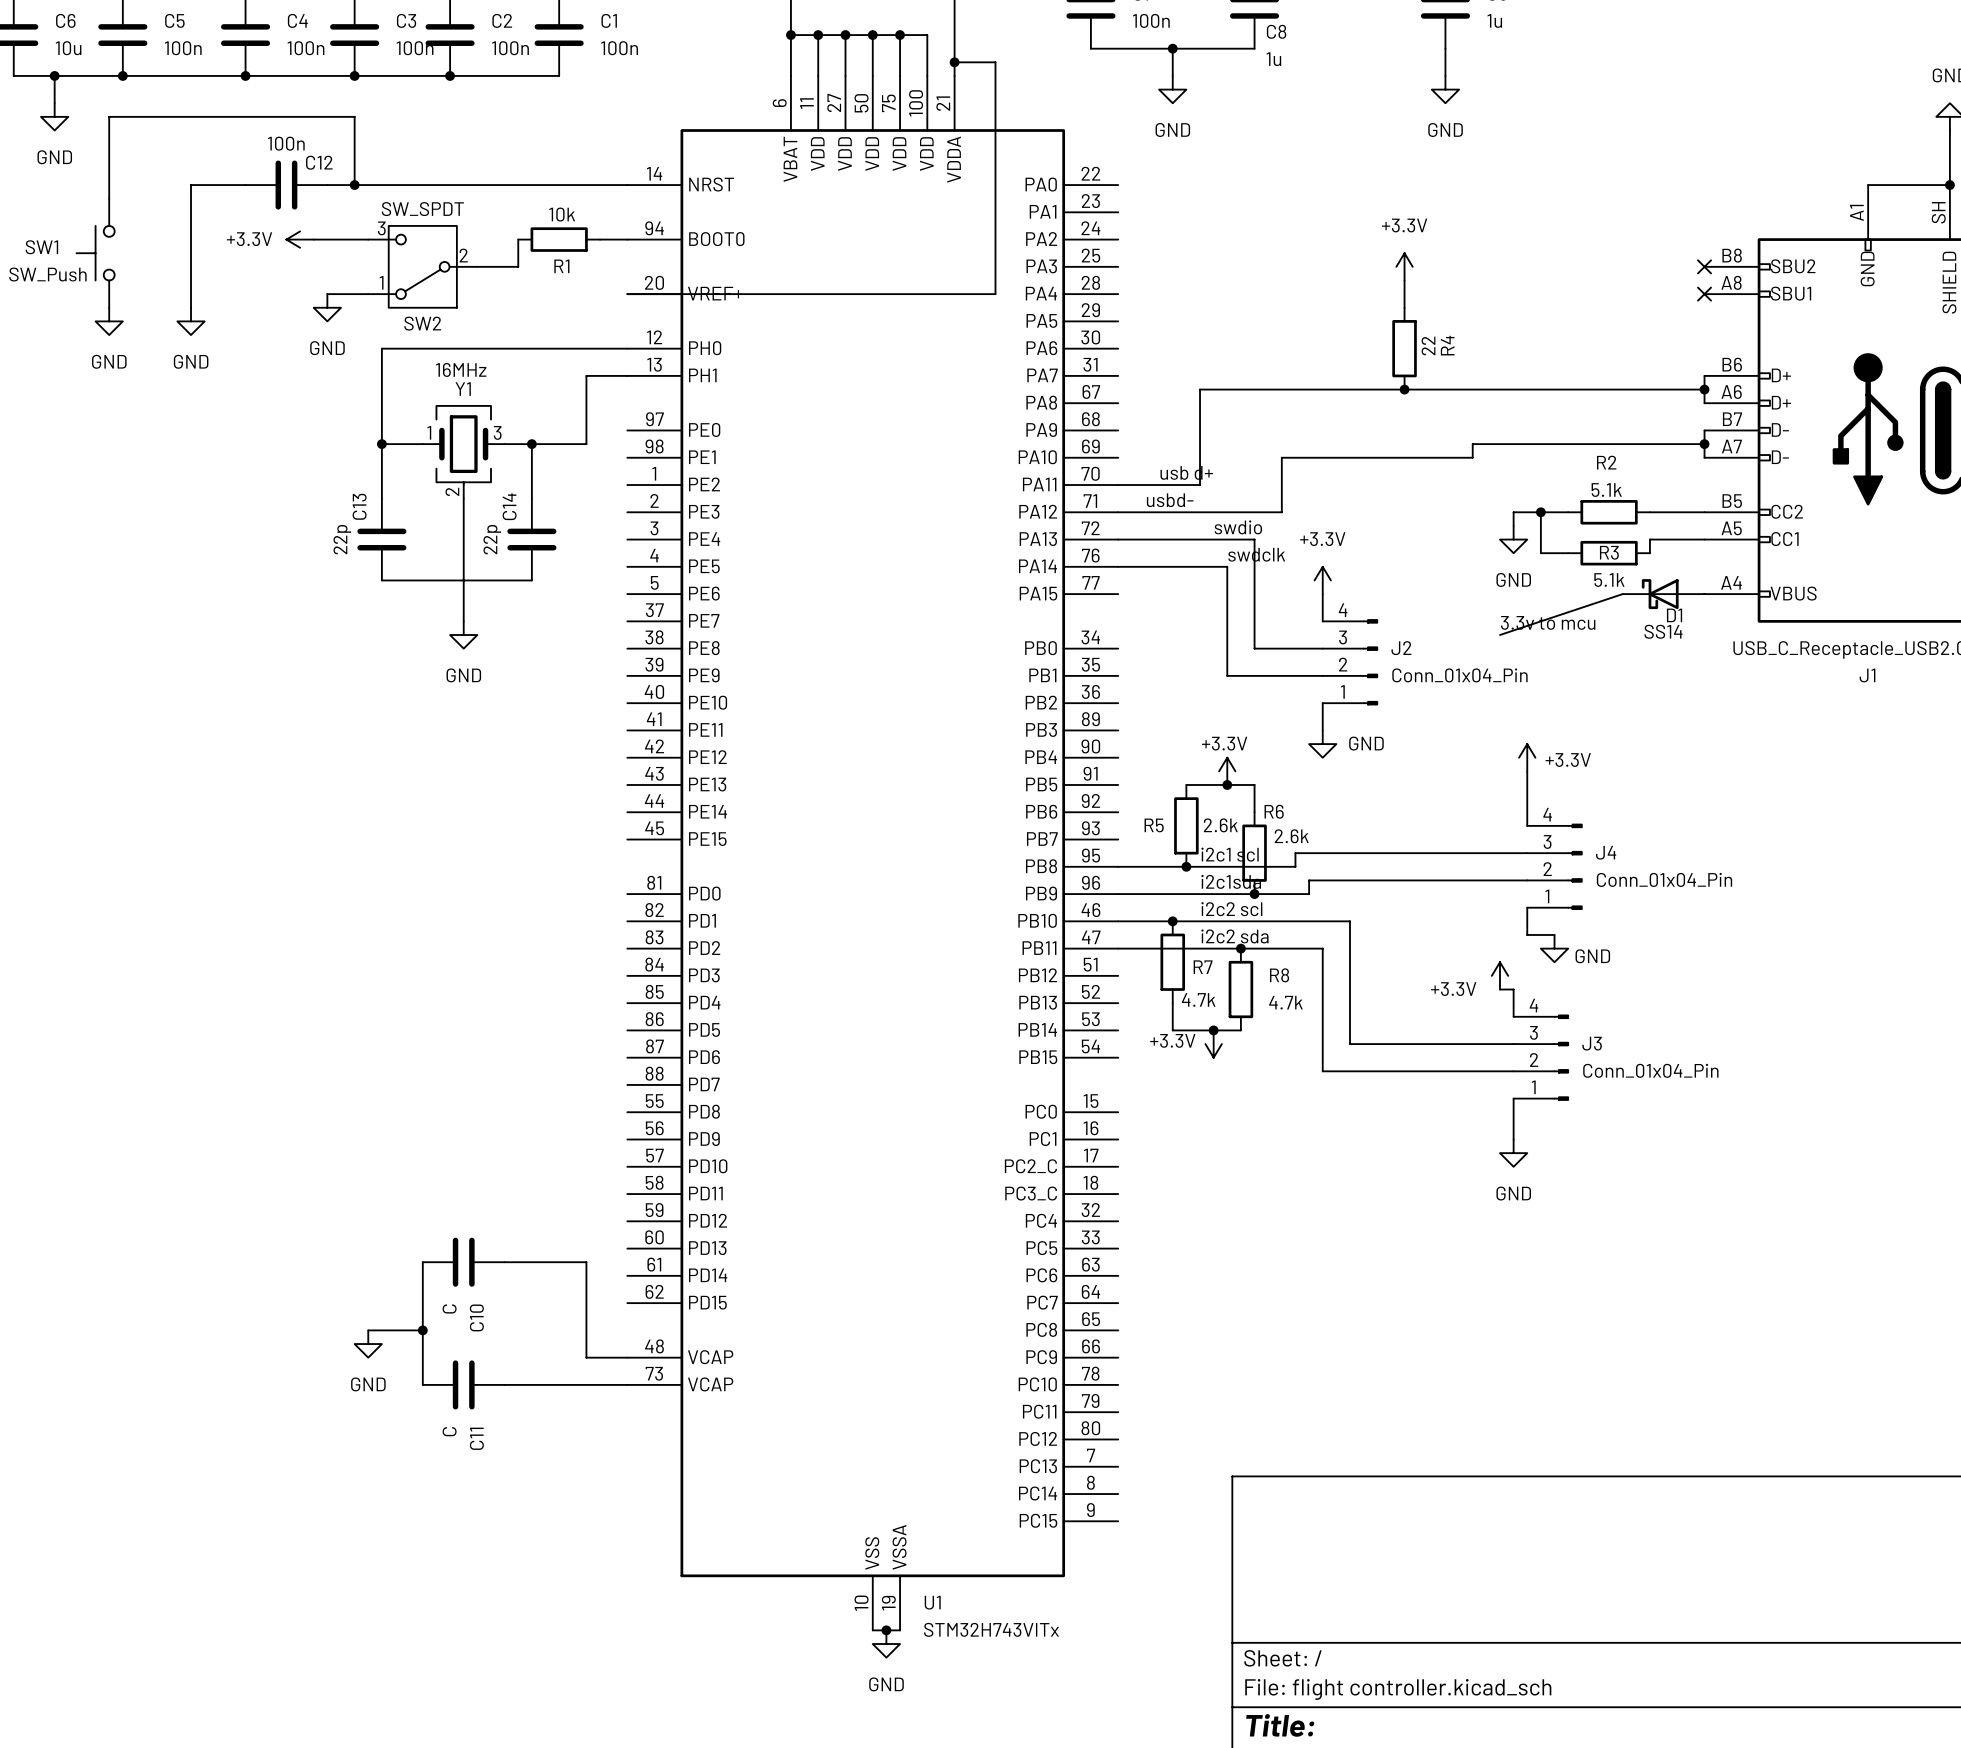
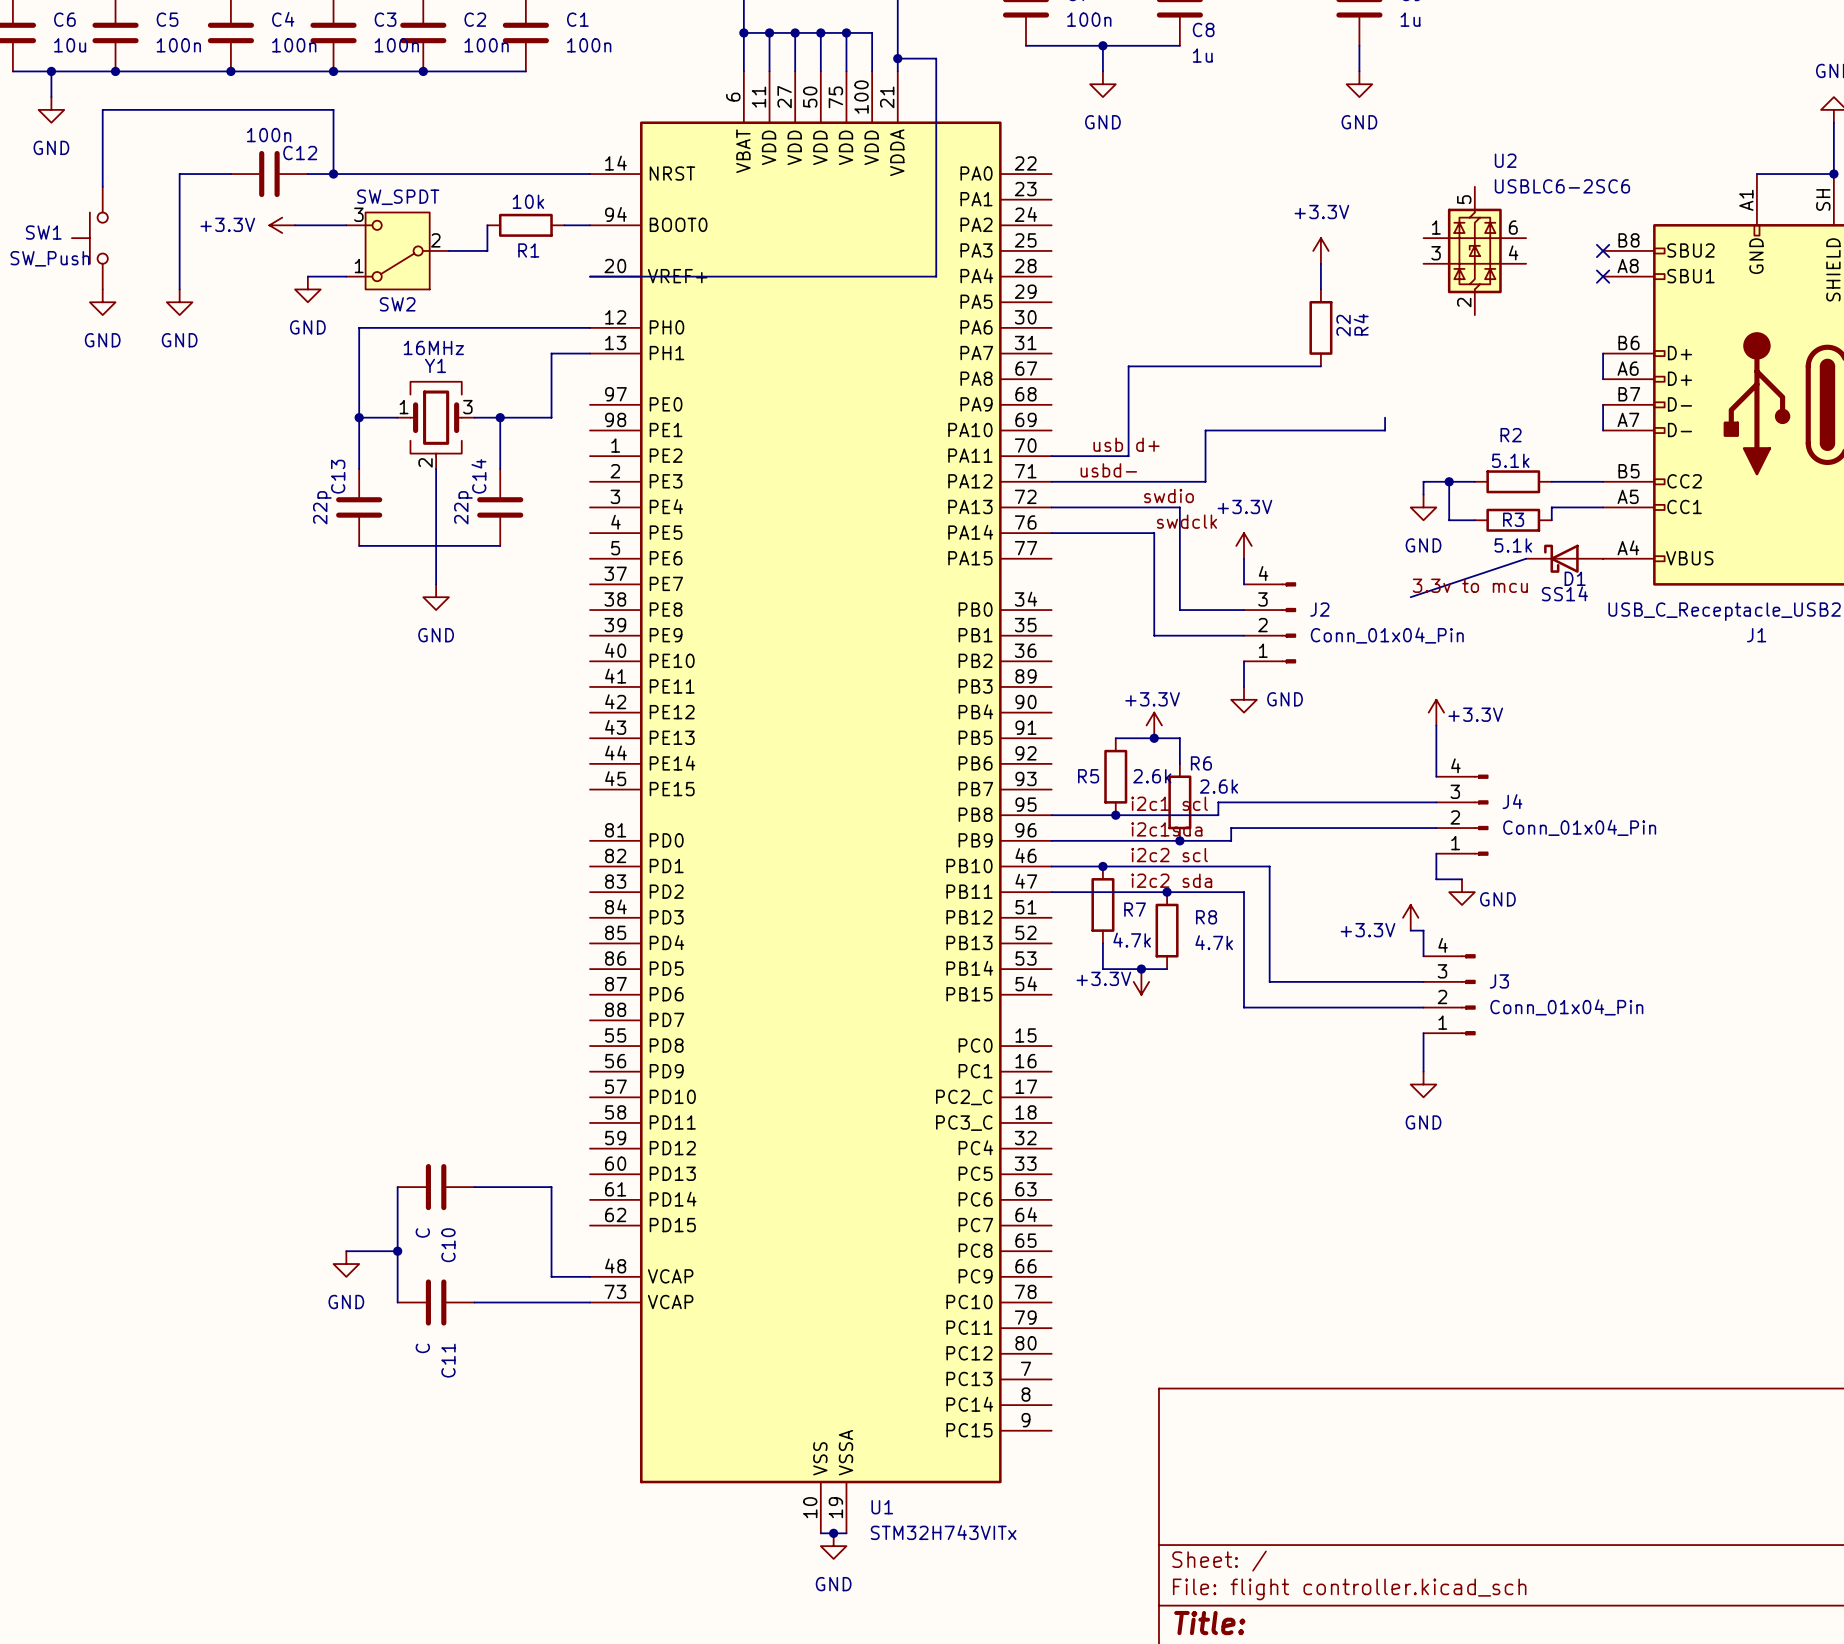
U2: none -> USBLC6-2SC6 (1474, 250)
wire: (1404, 389) (1704, 389) -> none
junction: (1404, 389) -> none
junction: (1704, 389) -> none
wire: (1472, 444) (1704, 444) -> none
junction: (1704, 444) -> none

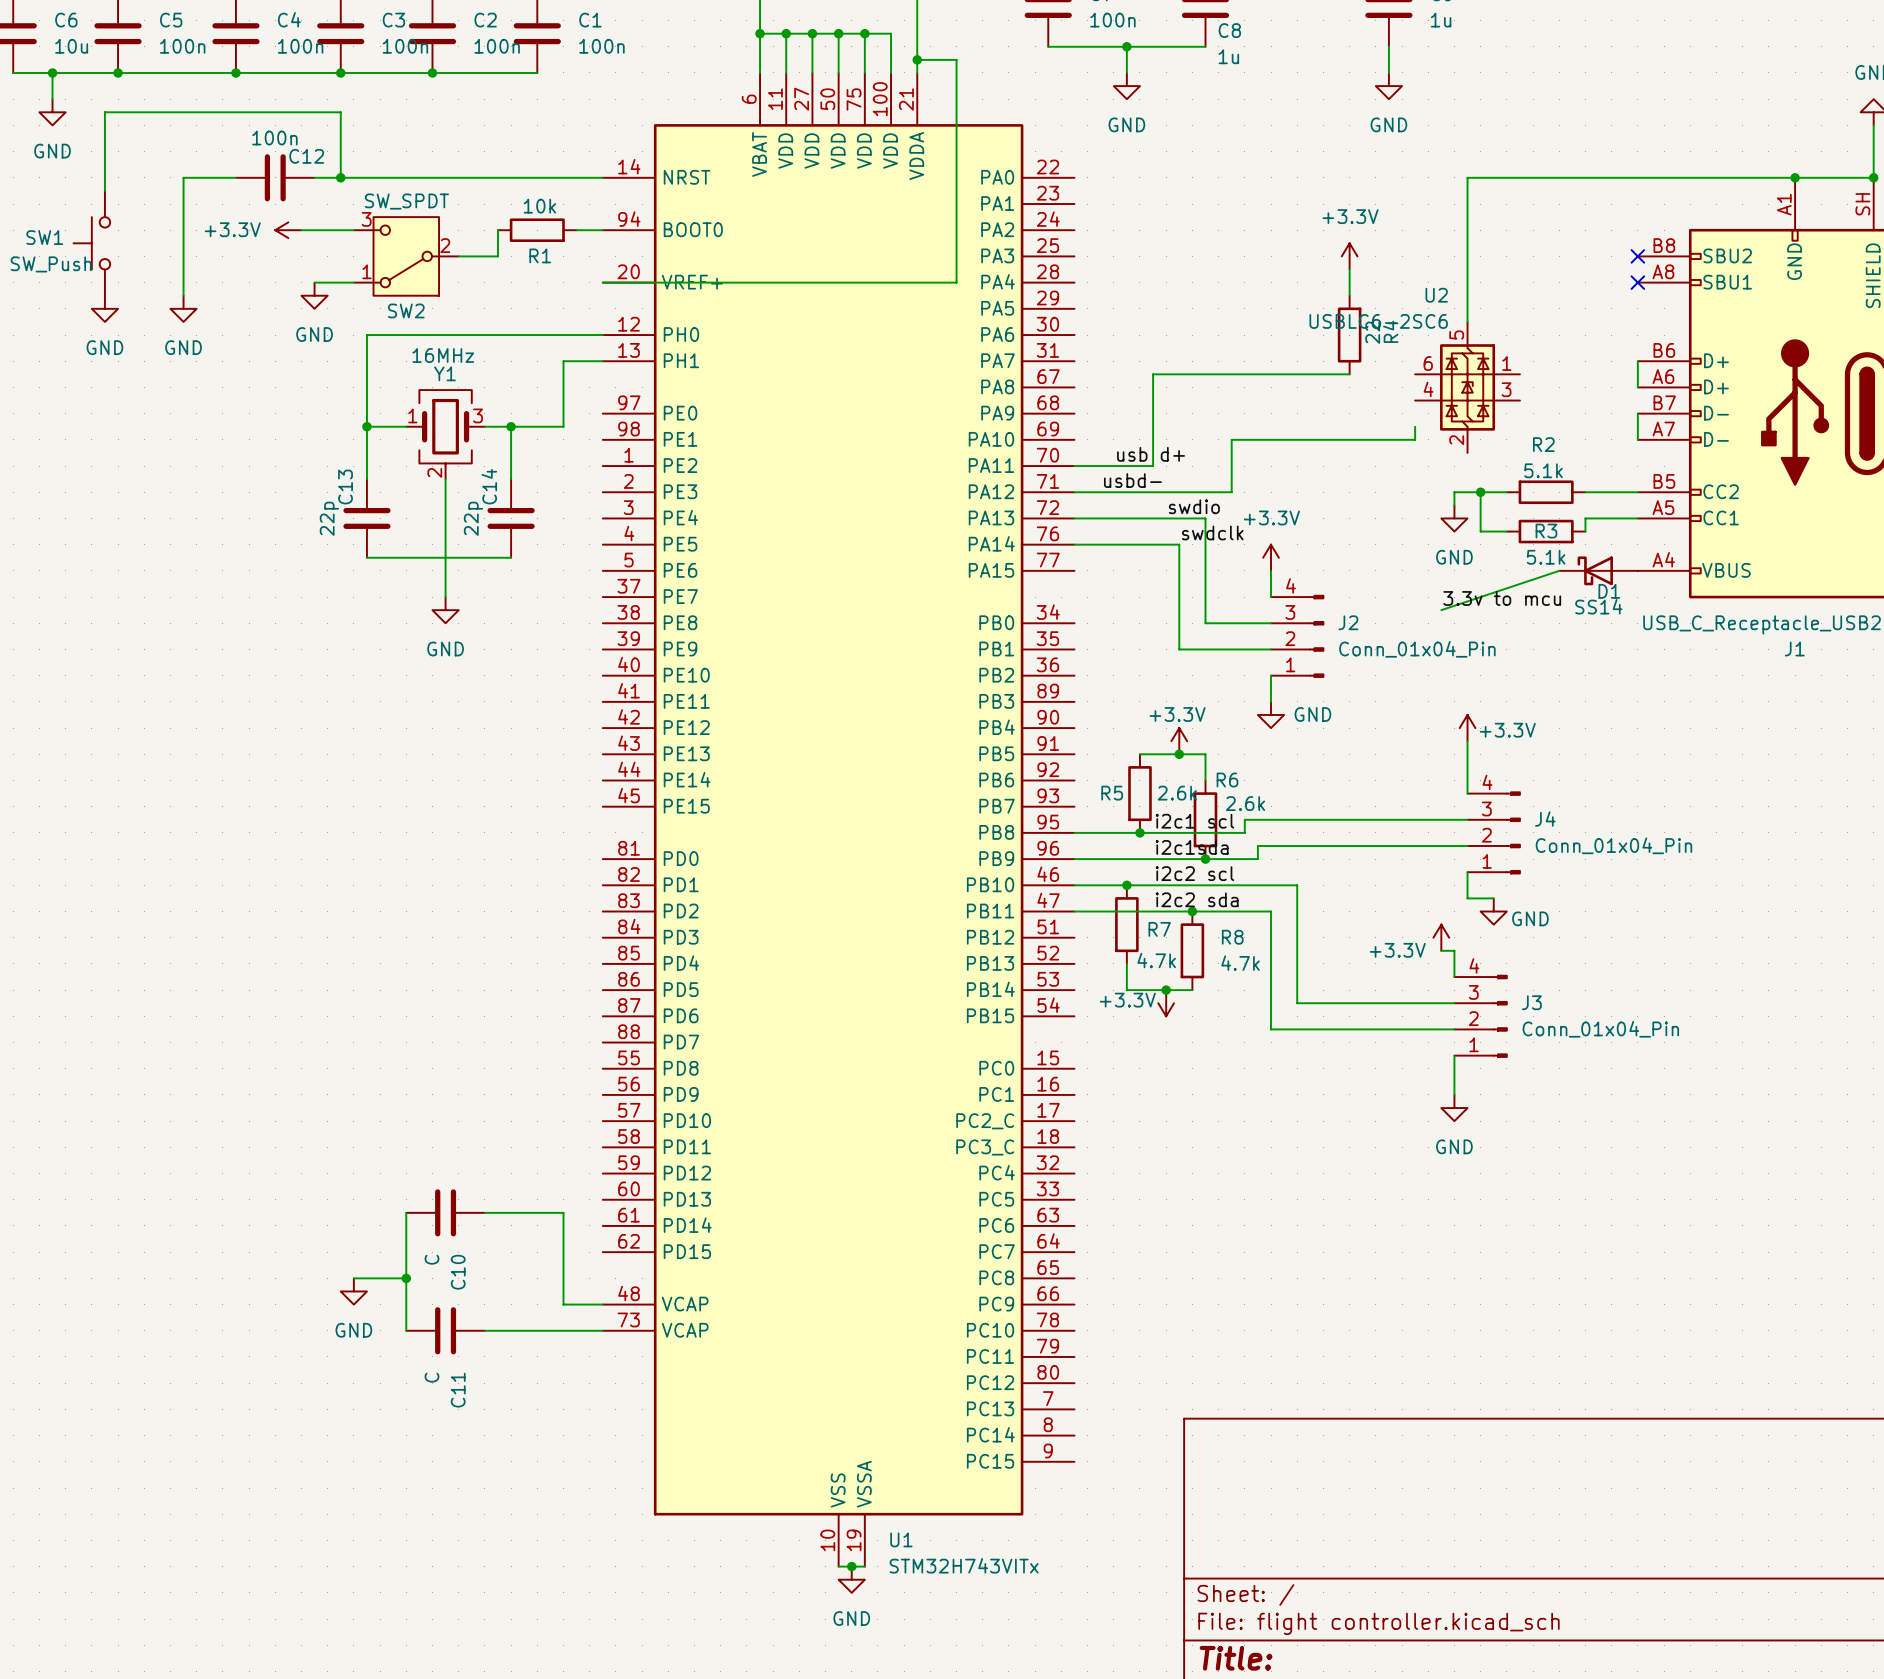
wire: none -> (1795, 177) (1467, 177) (1467, 321)
junction: none -> (1795, 177)
U2 flip: as is (1474, 250) -> left-right (1467, 387)
U2 position: (1474, 250) -> (1467, 387)

